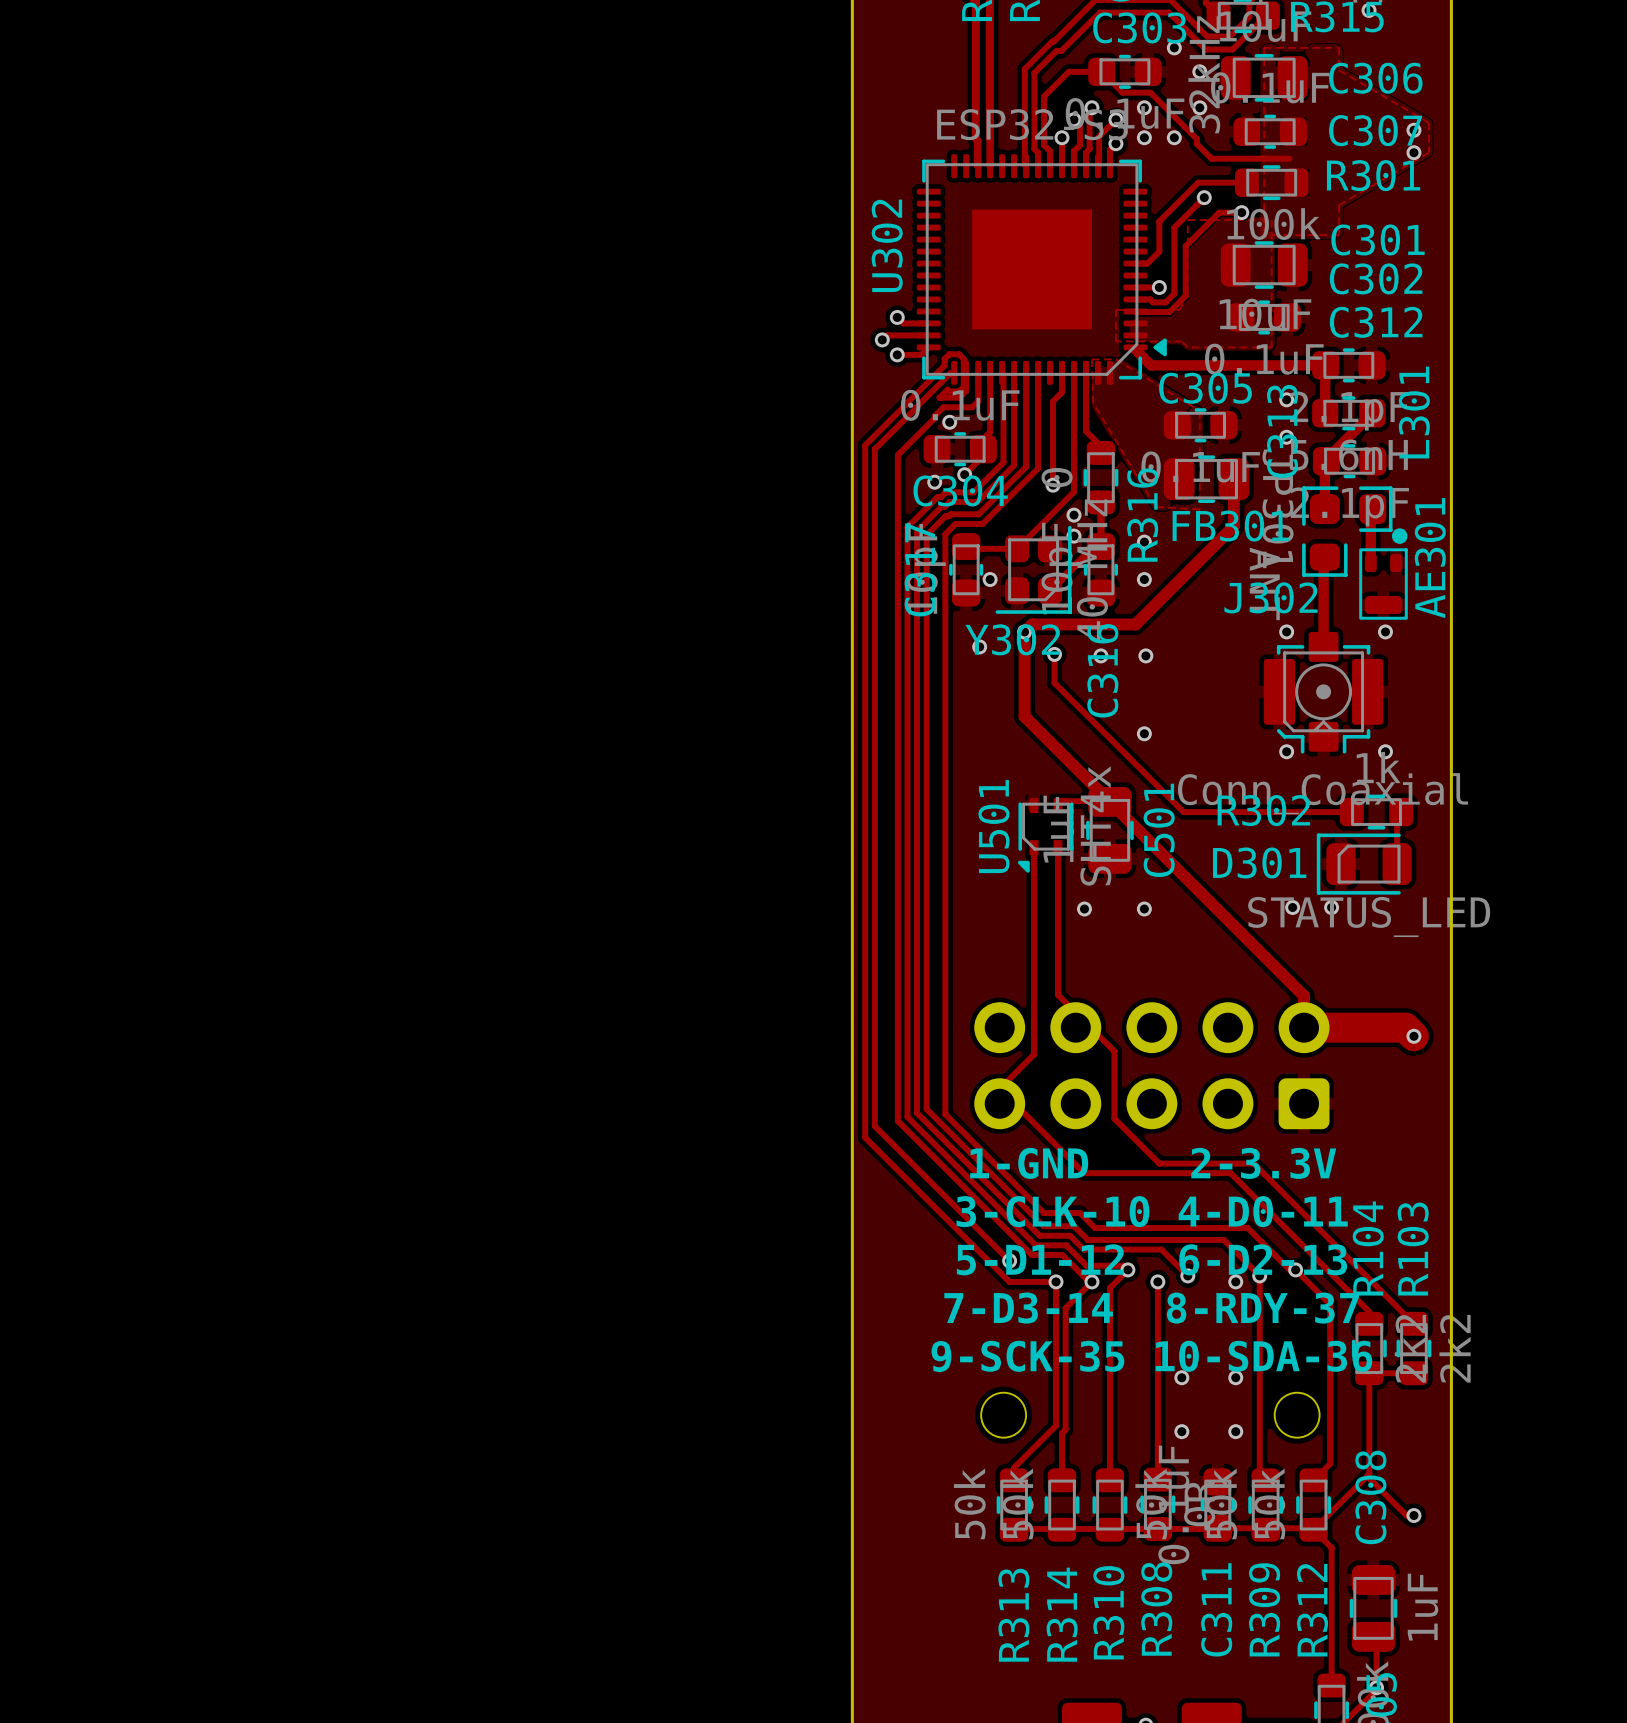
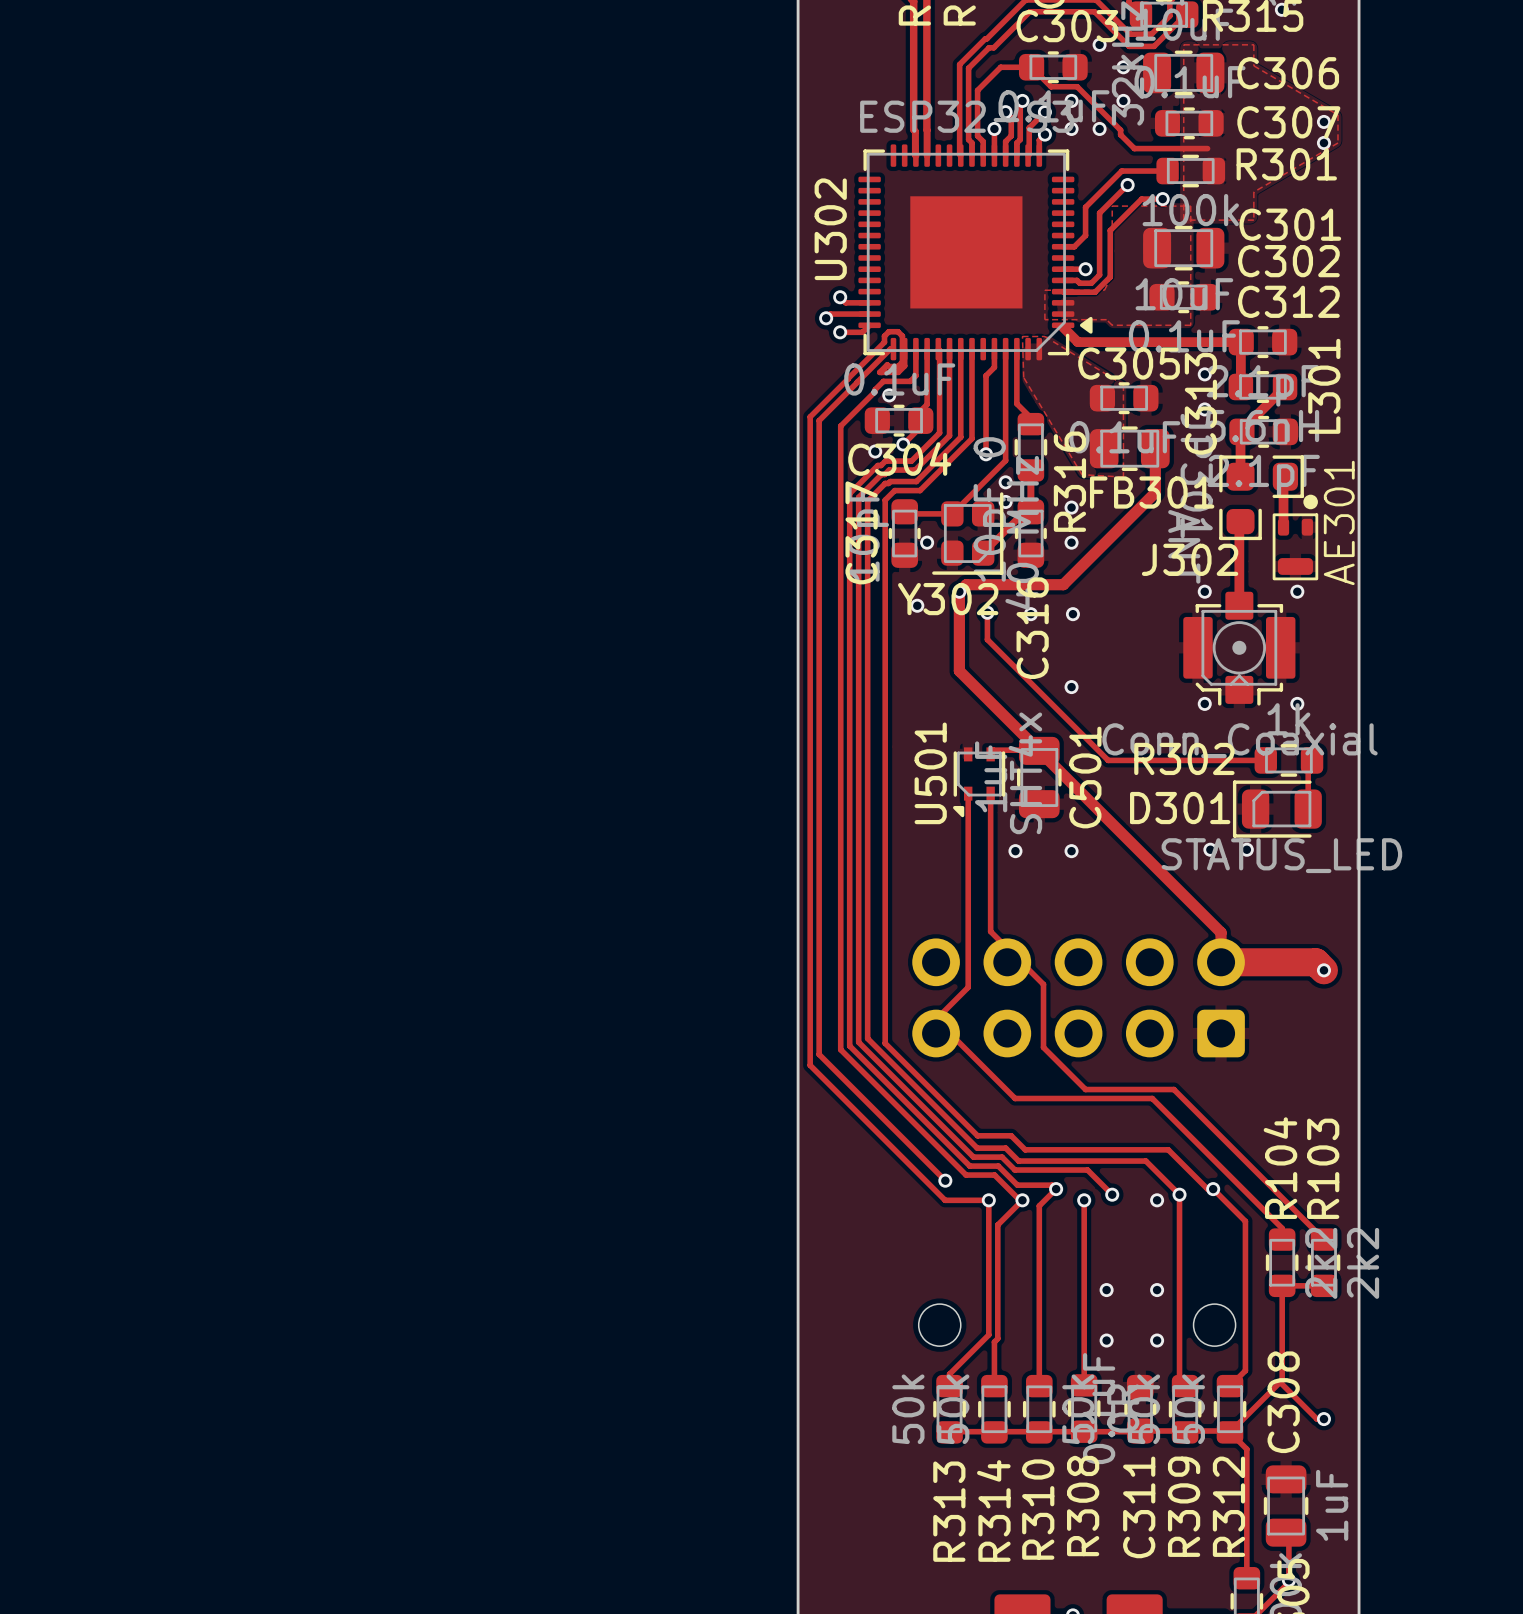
text: 1-GND 2-3.3V (1153, 1163) -> none
text: 3-CLK-10 4-D0-11 (1152, 1211) -> none
text: 5-D1-12 6-D2-13 (1151, 1259) -> none
text: 7-D3-14 8-RDY-37 (1151, 1308) -> none
text: 9-SCK-35 10-SDA-36 (1151, 1356) -> none

